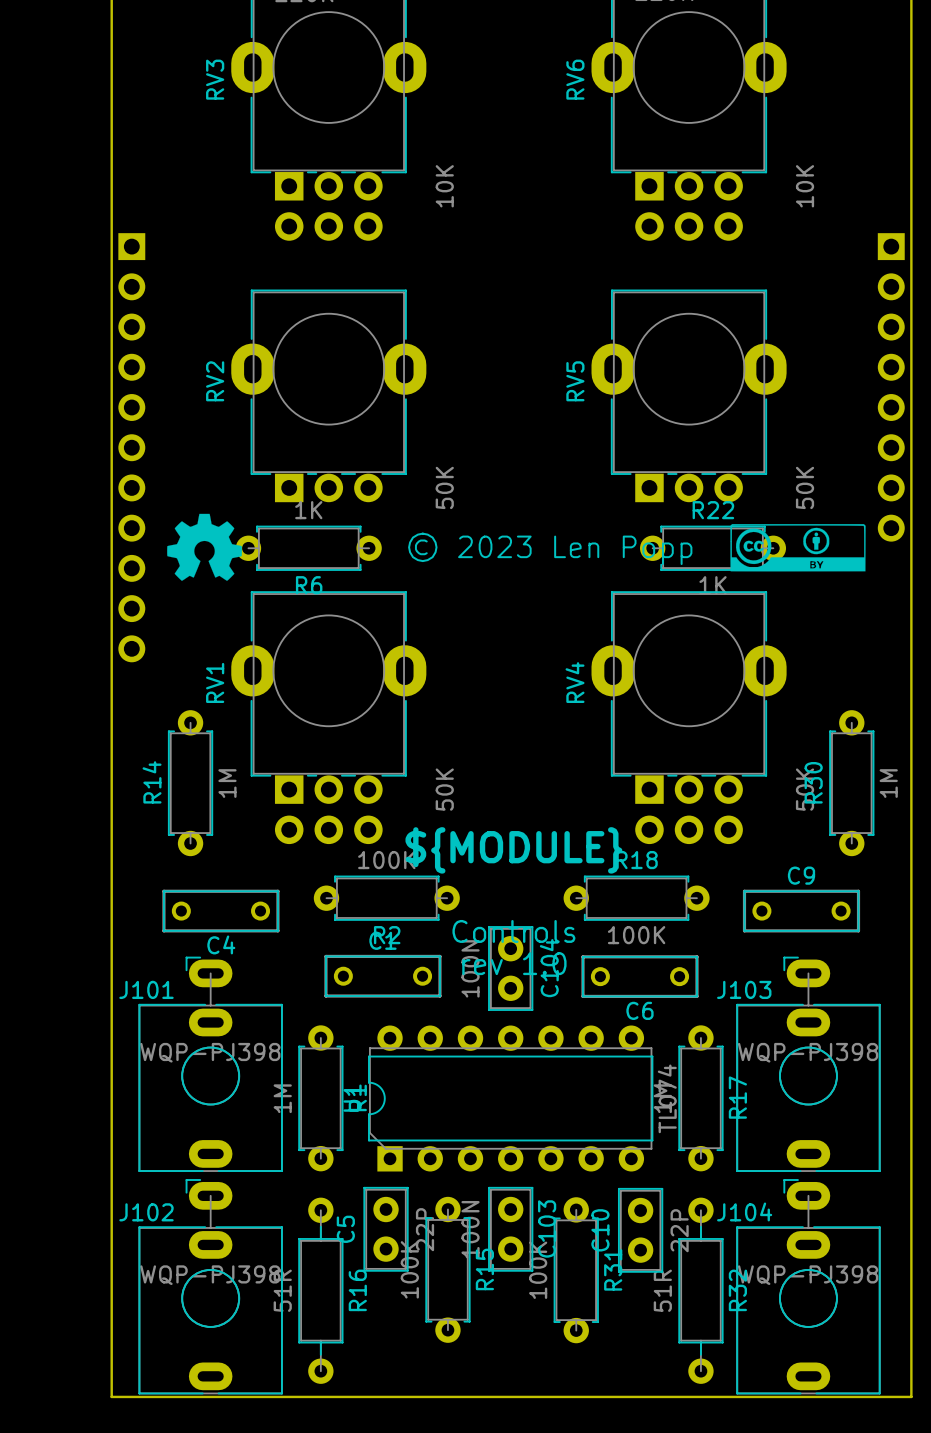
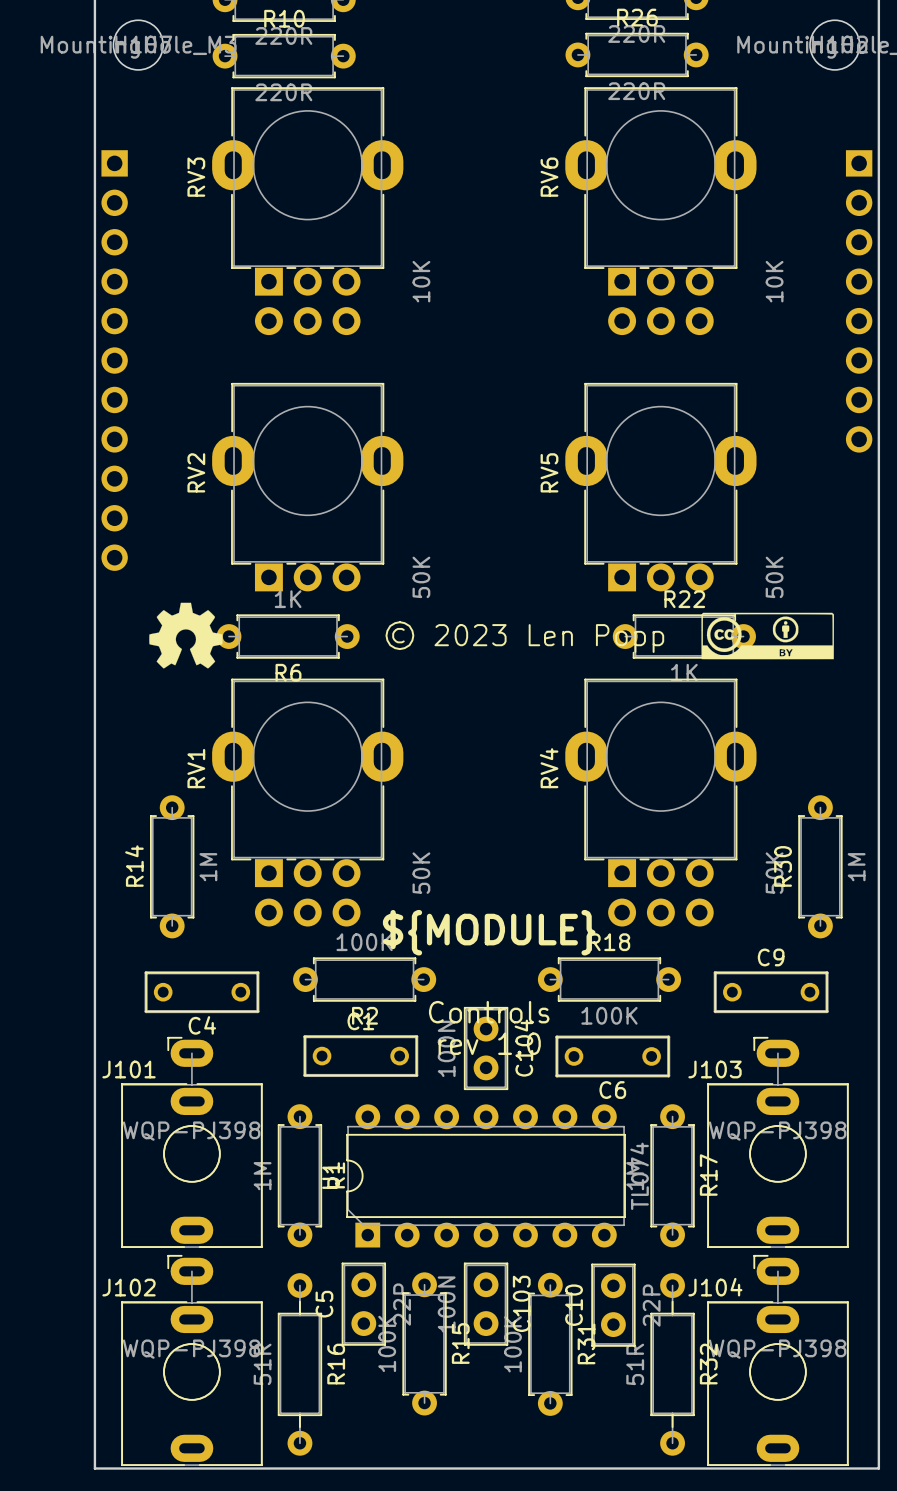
part position: (891, 387) -> (859, 301)
part position: (131, 447) -> (114, 360)

